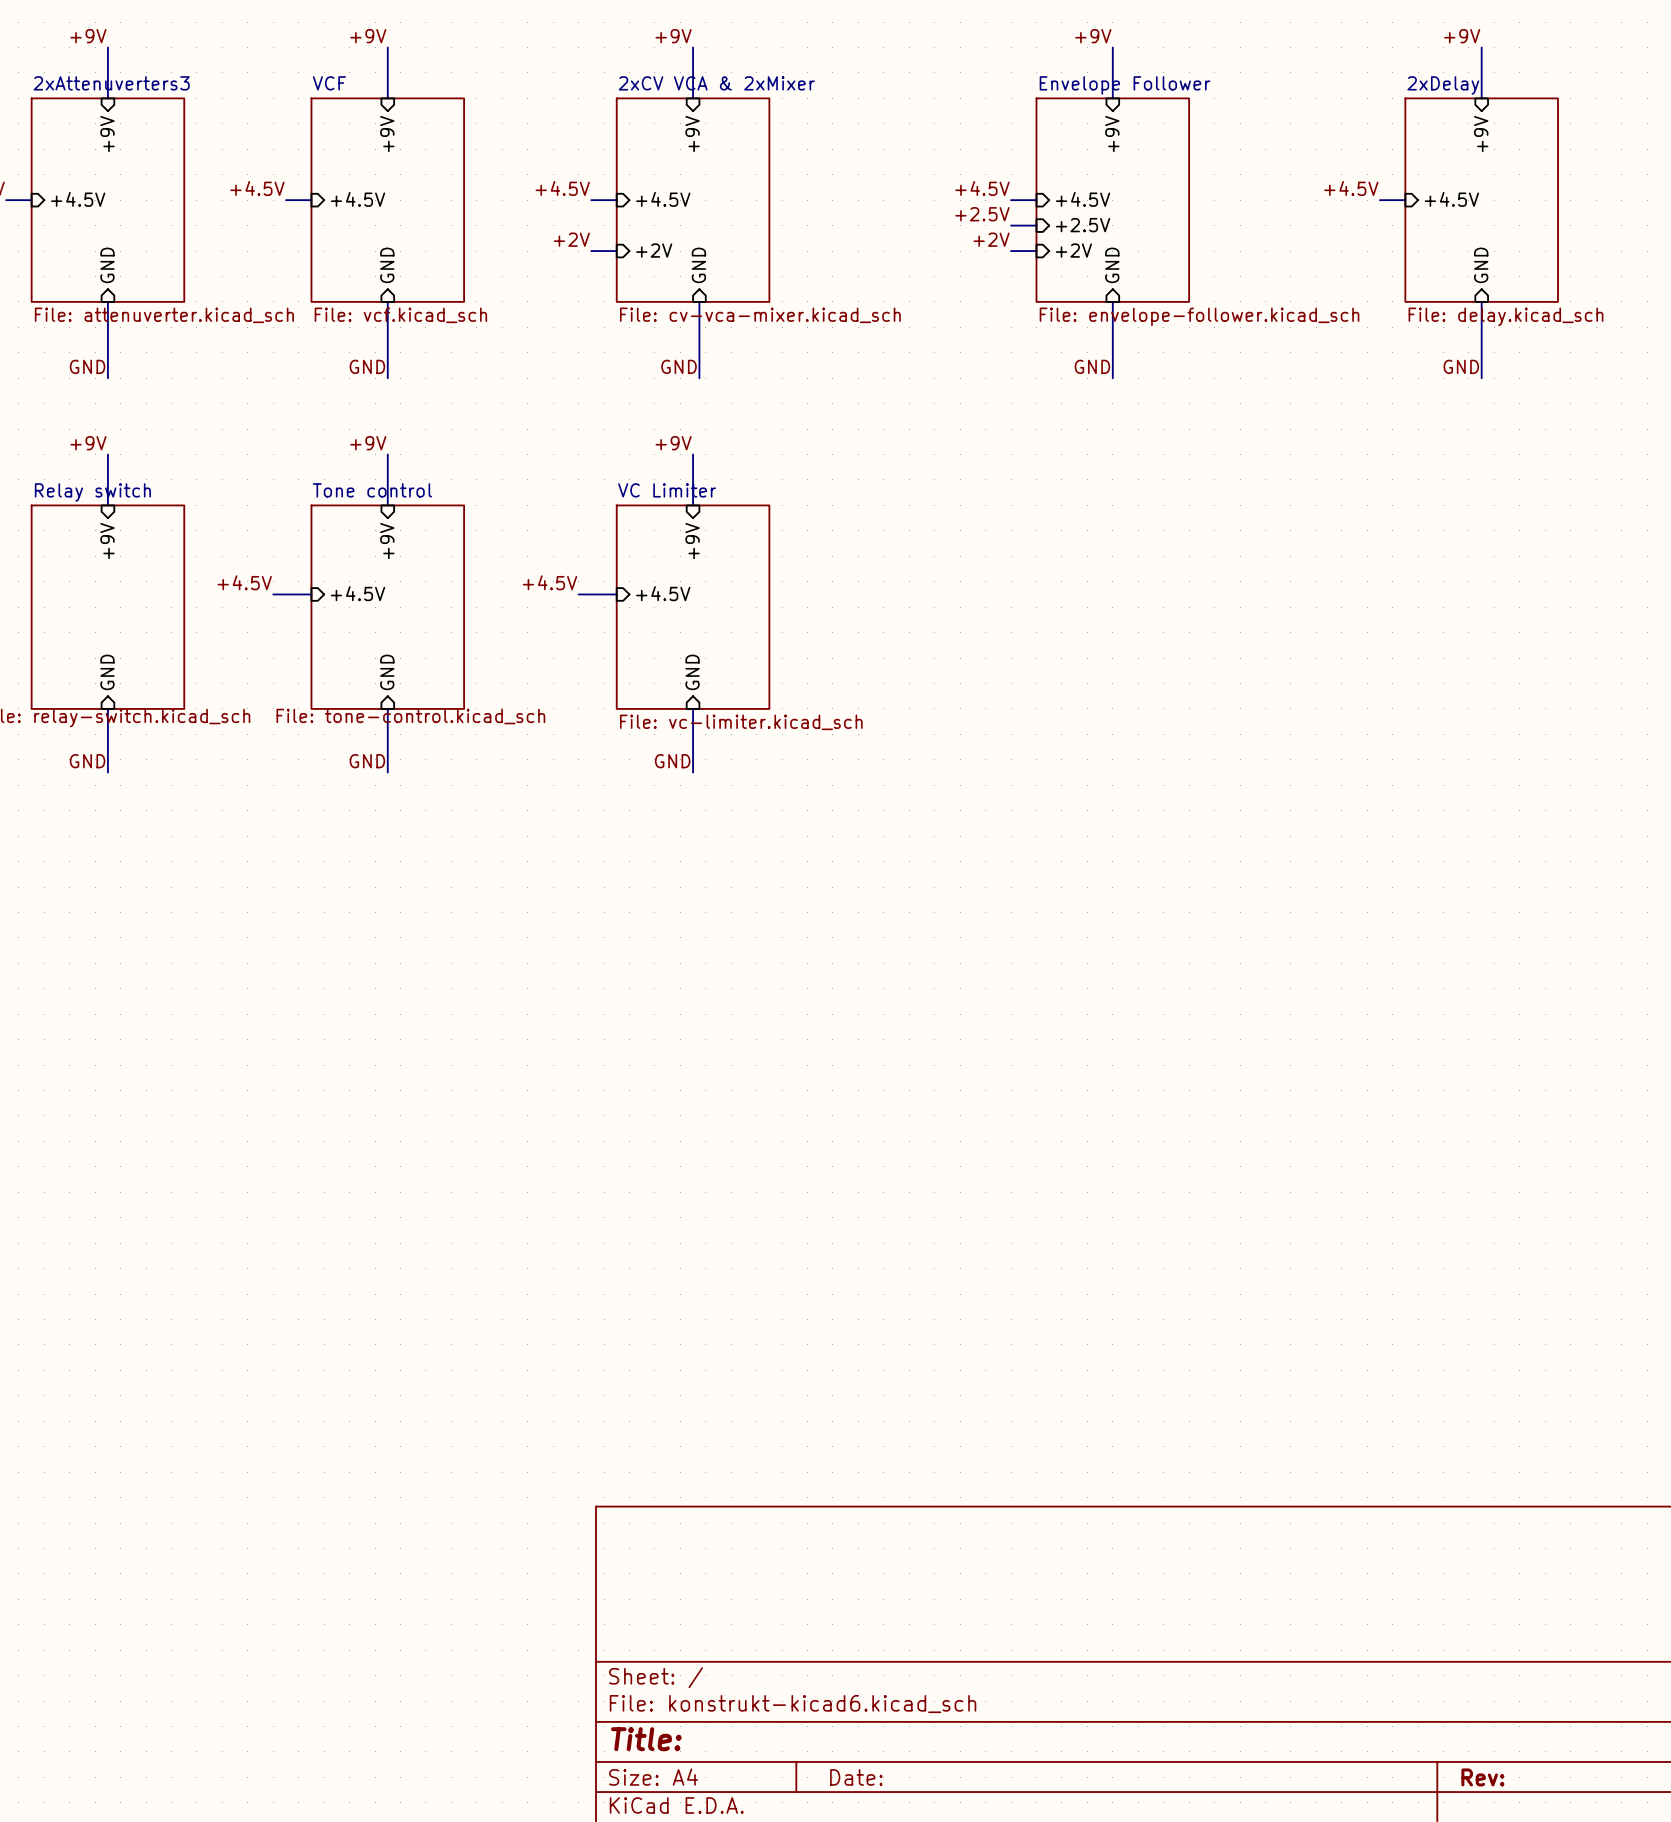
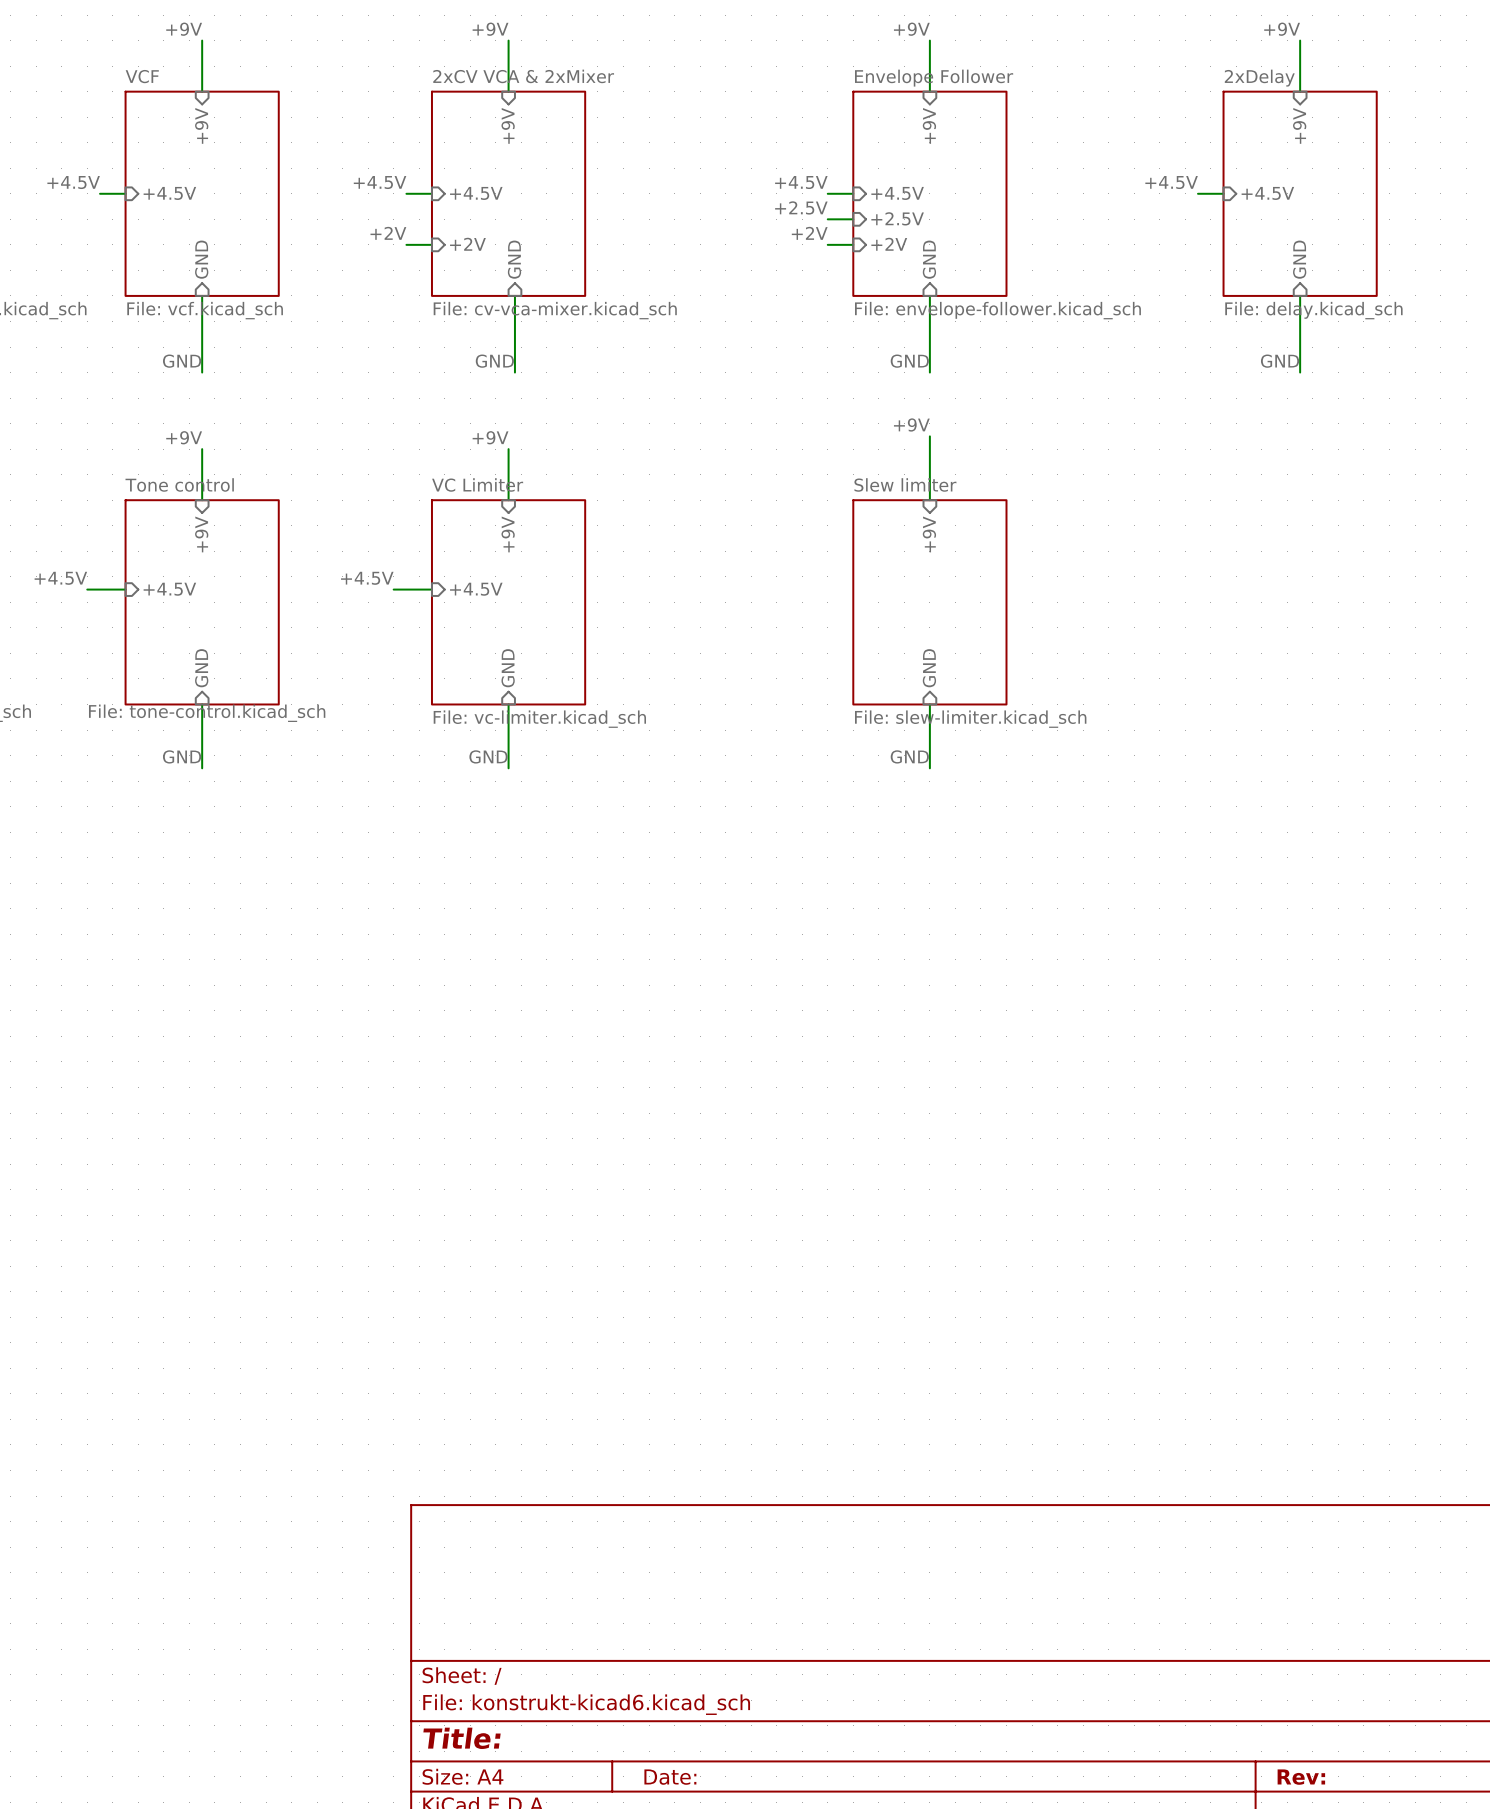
label: none -> +9V (911, 424)
wire: none -> (929, 436) (929, 500)
sheet pin: none -> +9V (929, 534)
sheet Slew limiter: none -> File: slew-limiter.kicad_sch (929, 602)
sheet pin: none -> GND (929, 668)
wire: none -> (929, 704) (929, 768)
label: none -> GND (909, 756)

